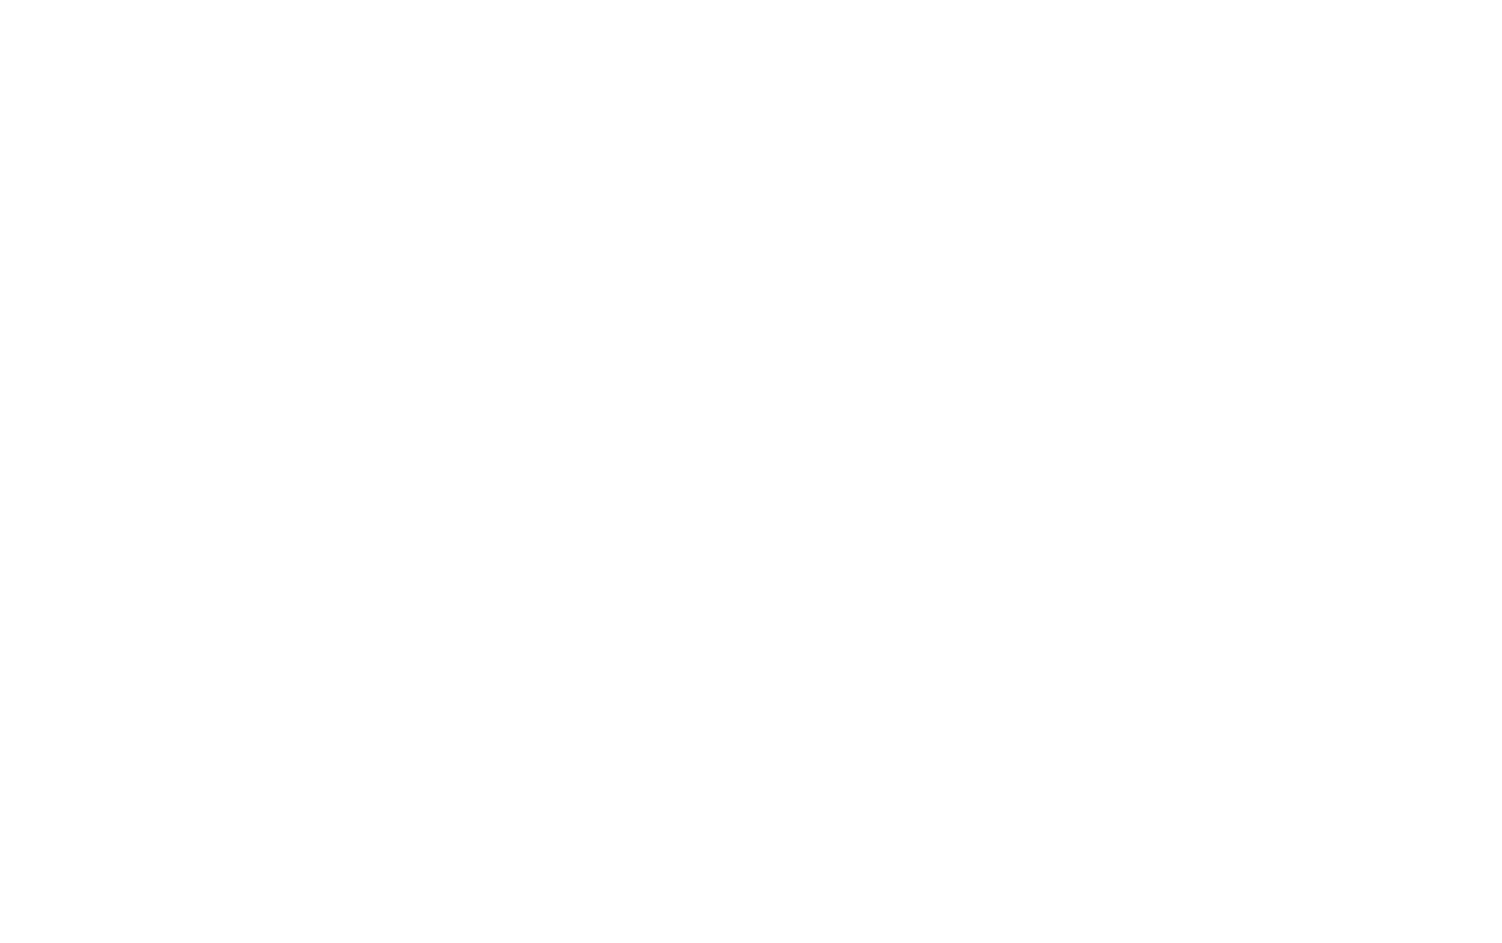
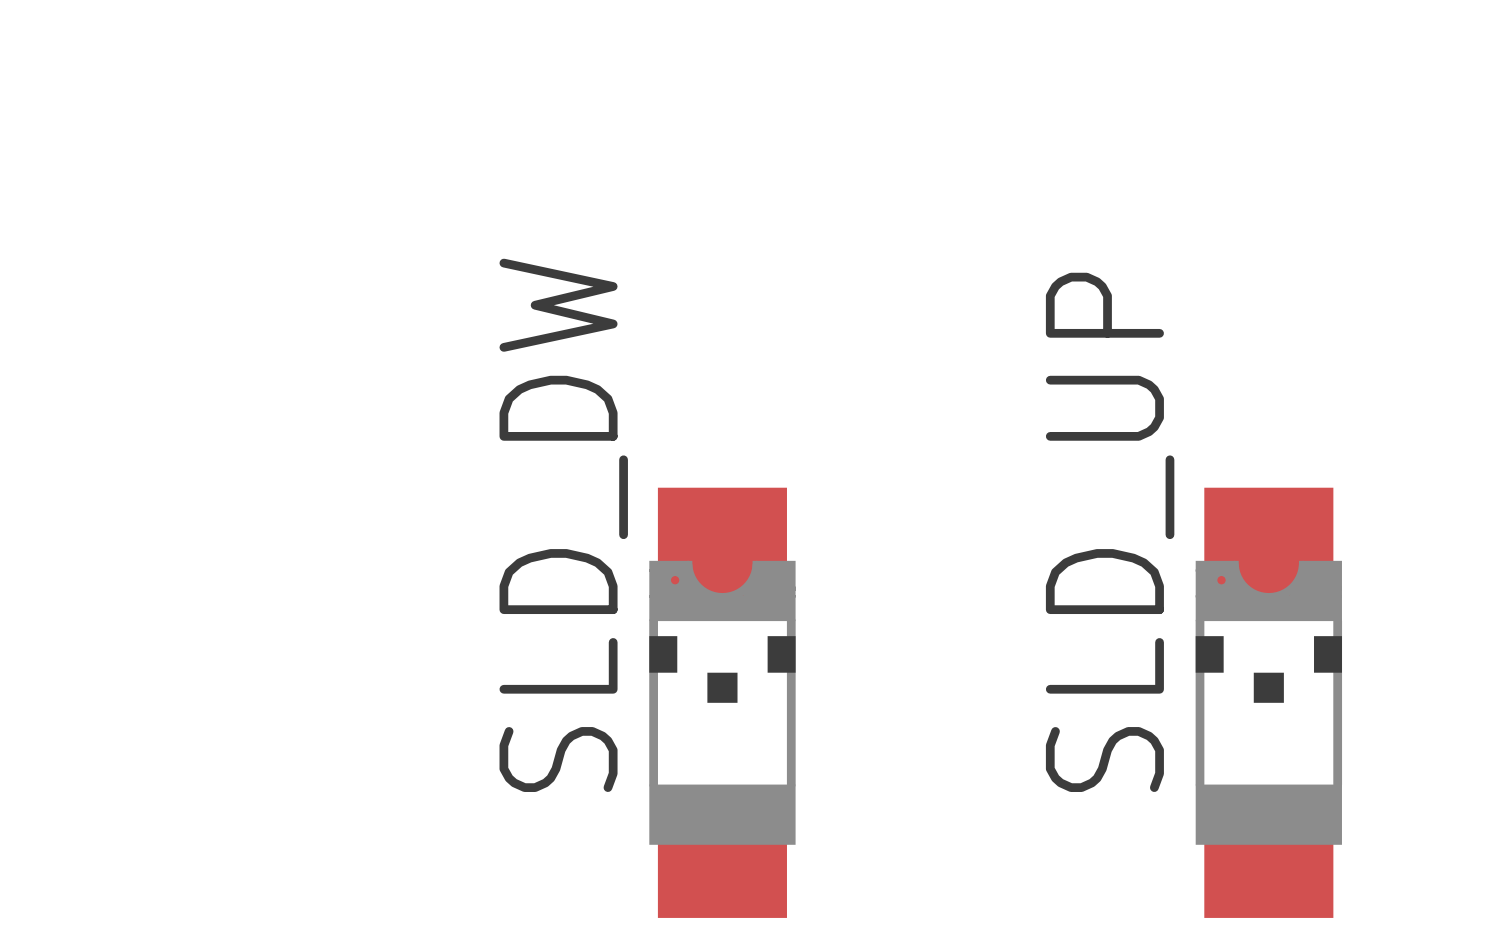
SLD_DW: none -> (722, 702)
SLD_UP: none -> (1268, 702)

